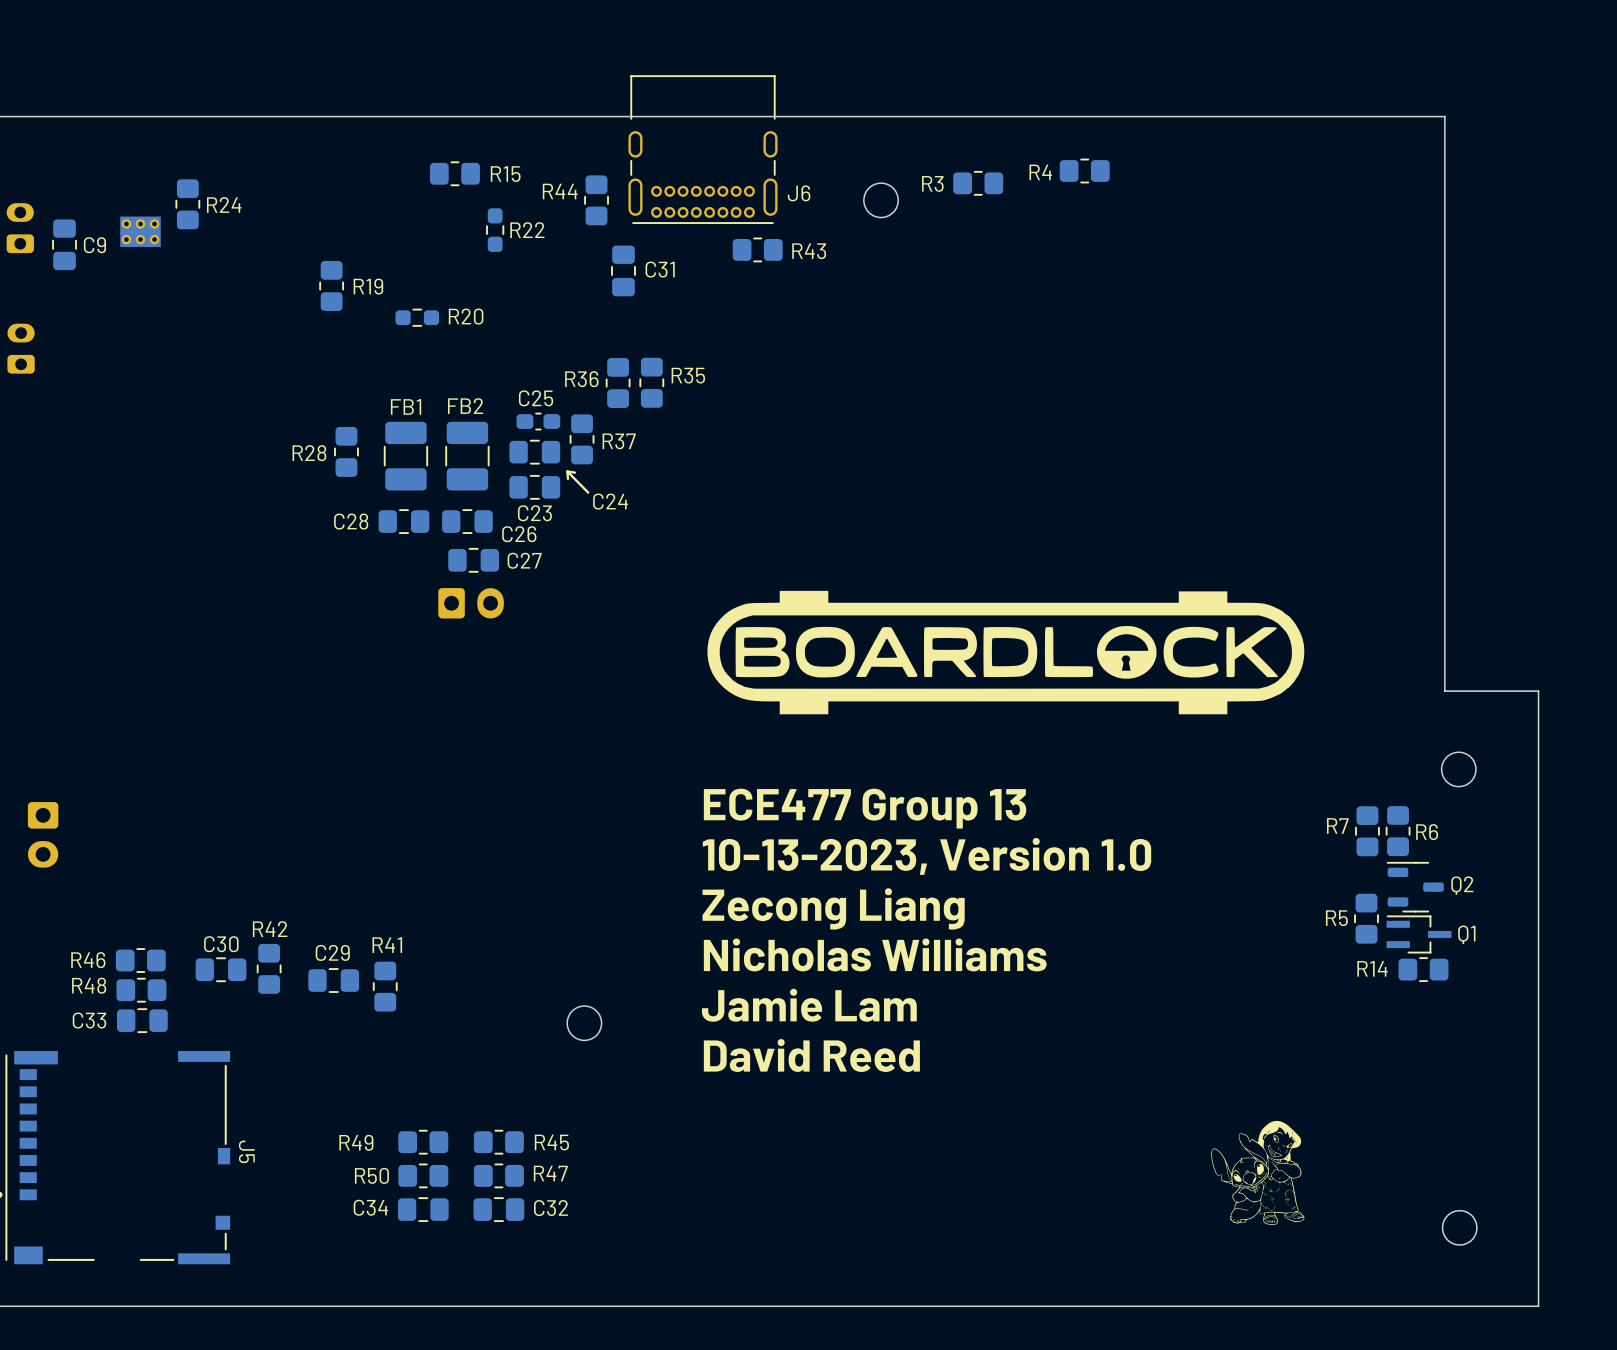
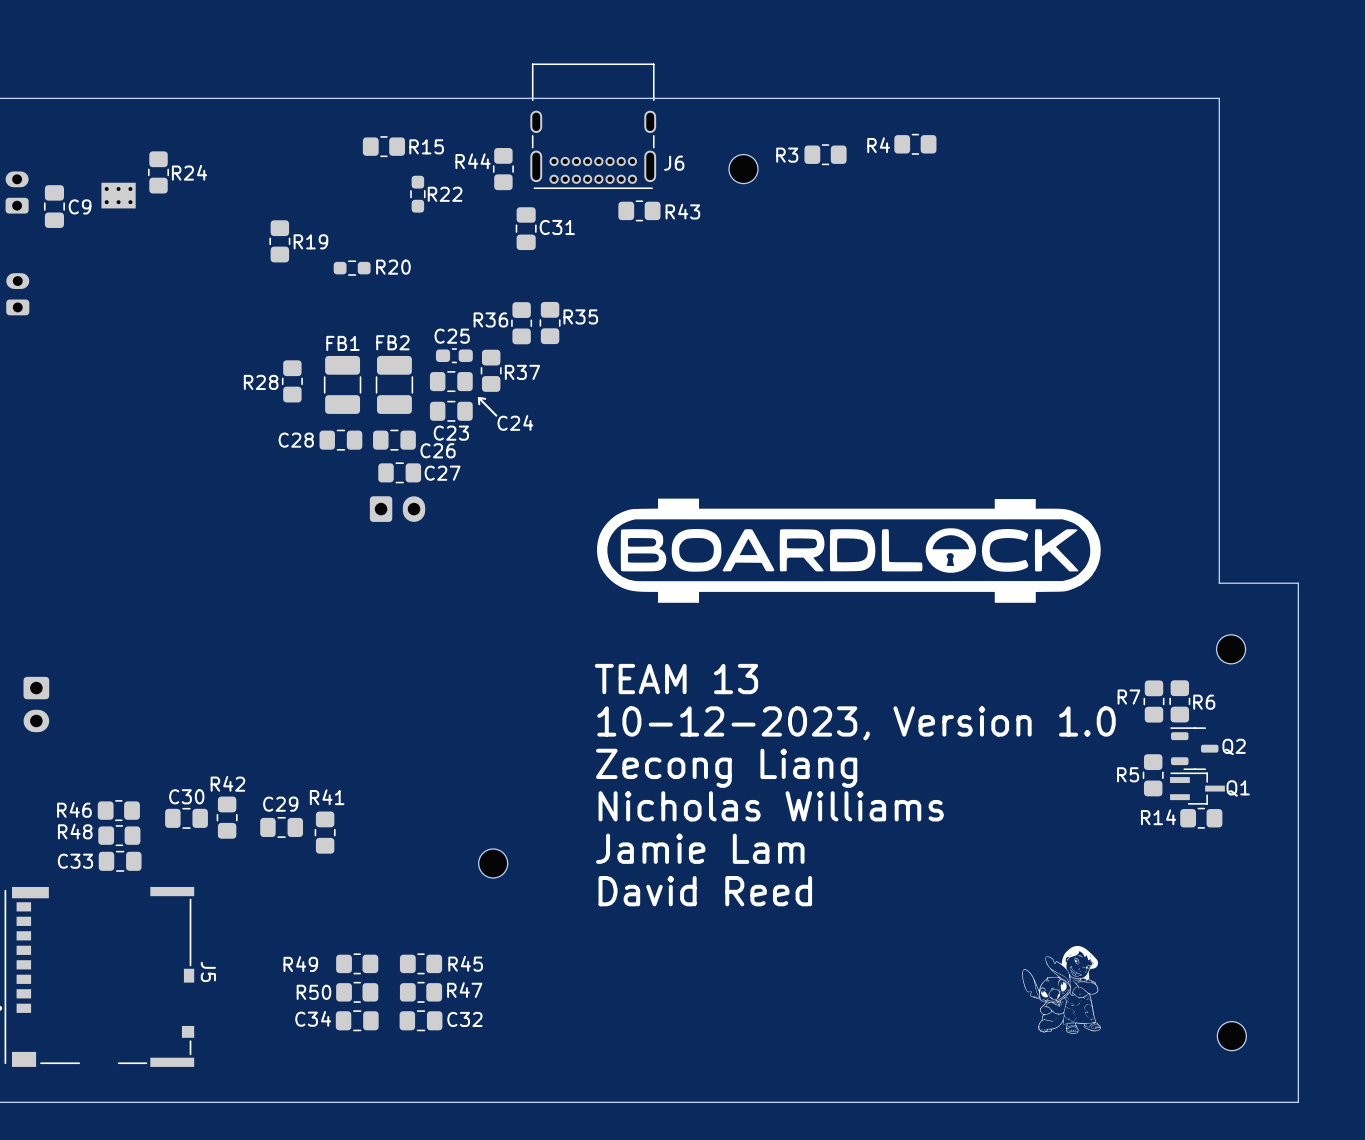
text: ECE477 Group 13 (865, 808) -> TEAM 13 (676, 679)
text: 10-13-2023, Version 1.0 (926, 856) -> 10-12-2023, Version 1.0 (856, 723)

